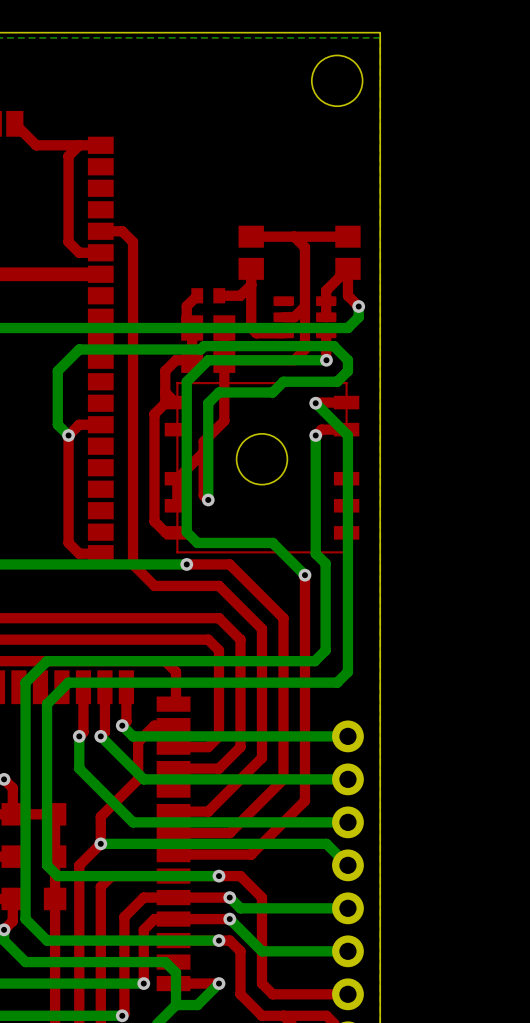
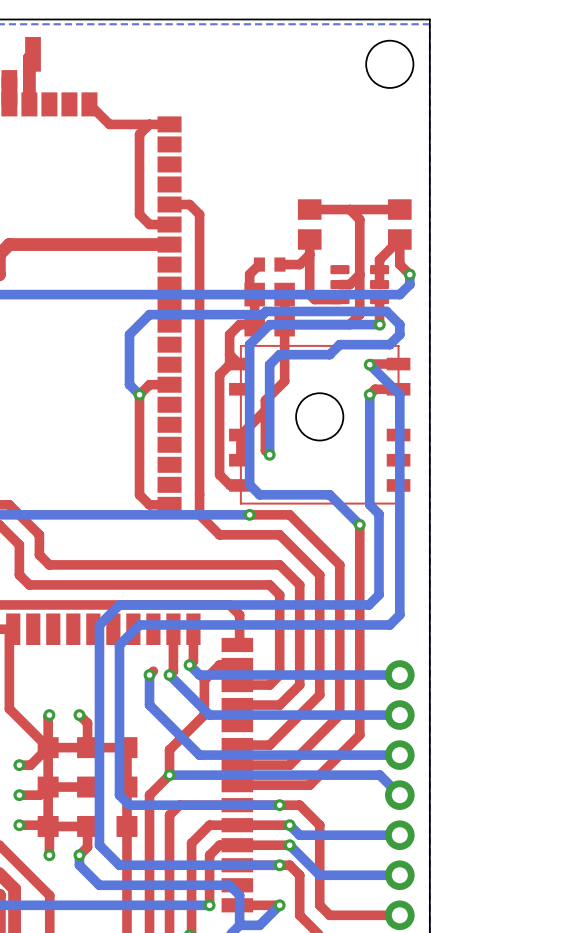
top track: (83, 687) (83, 732) -> none

